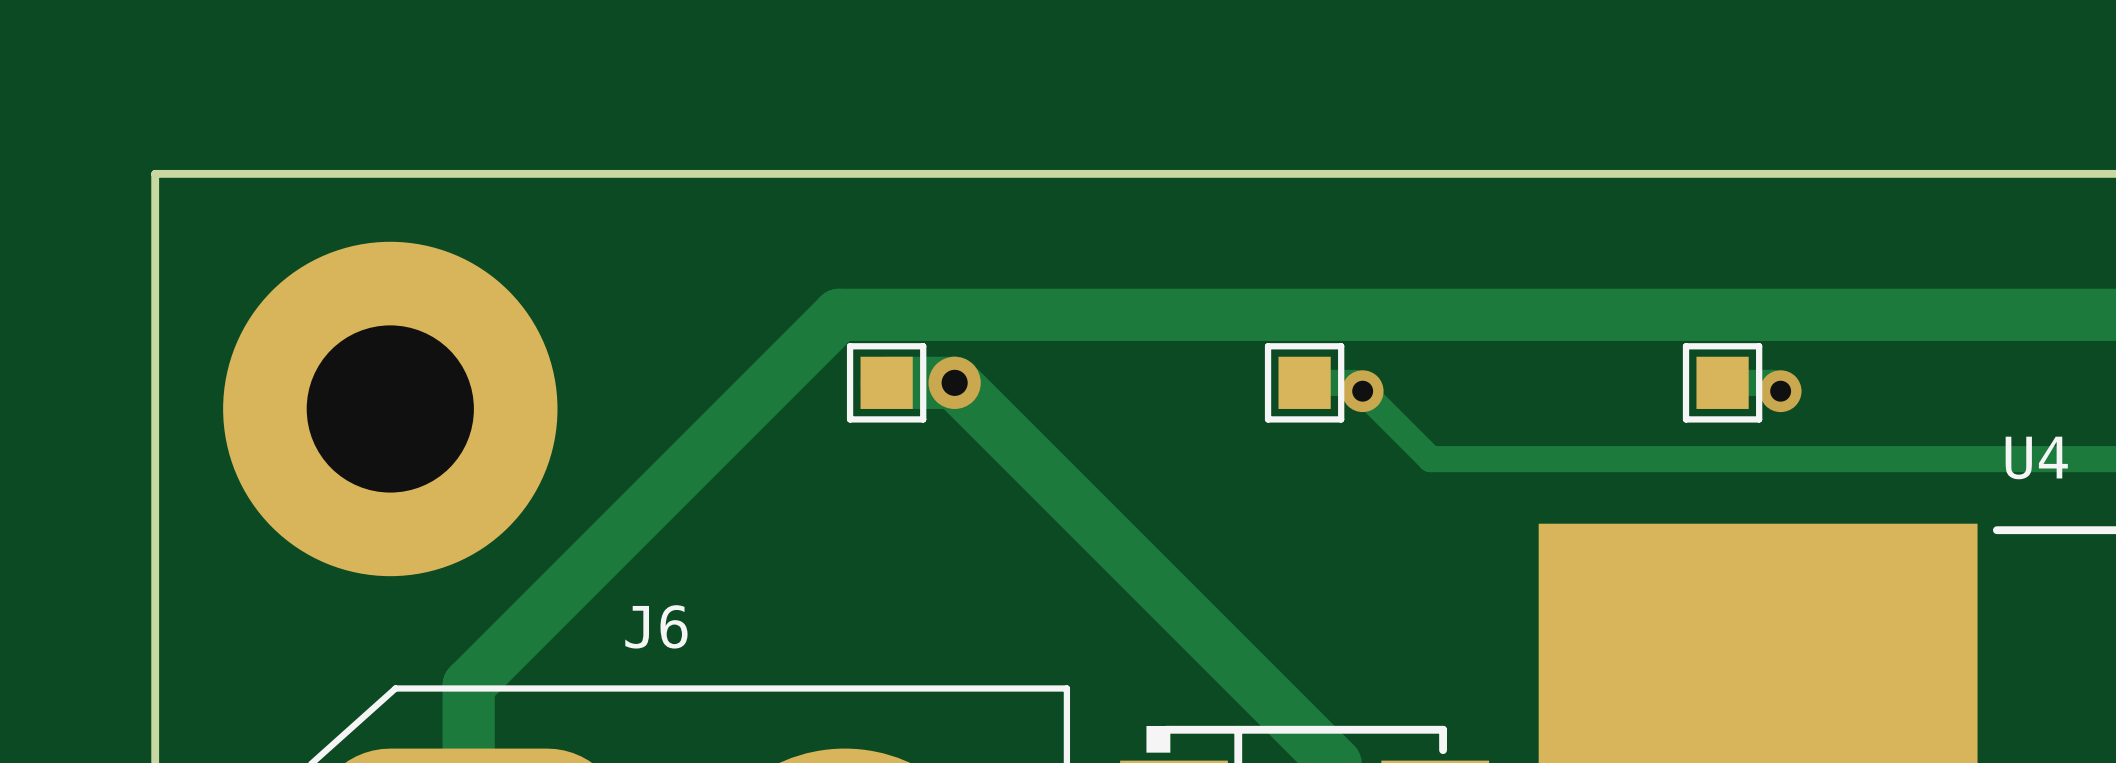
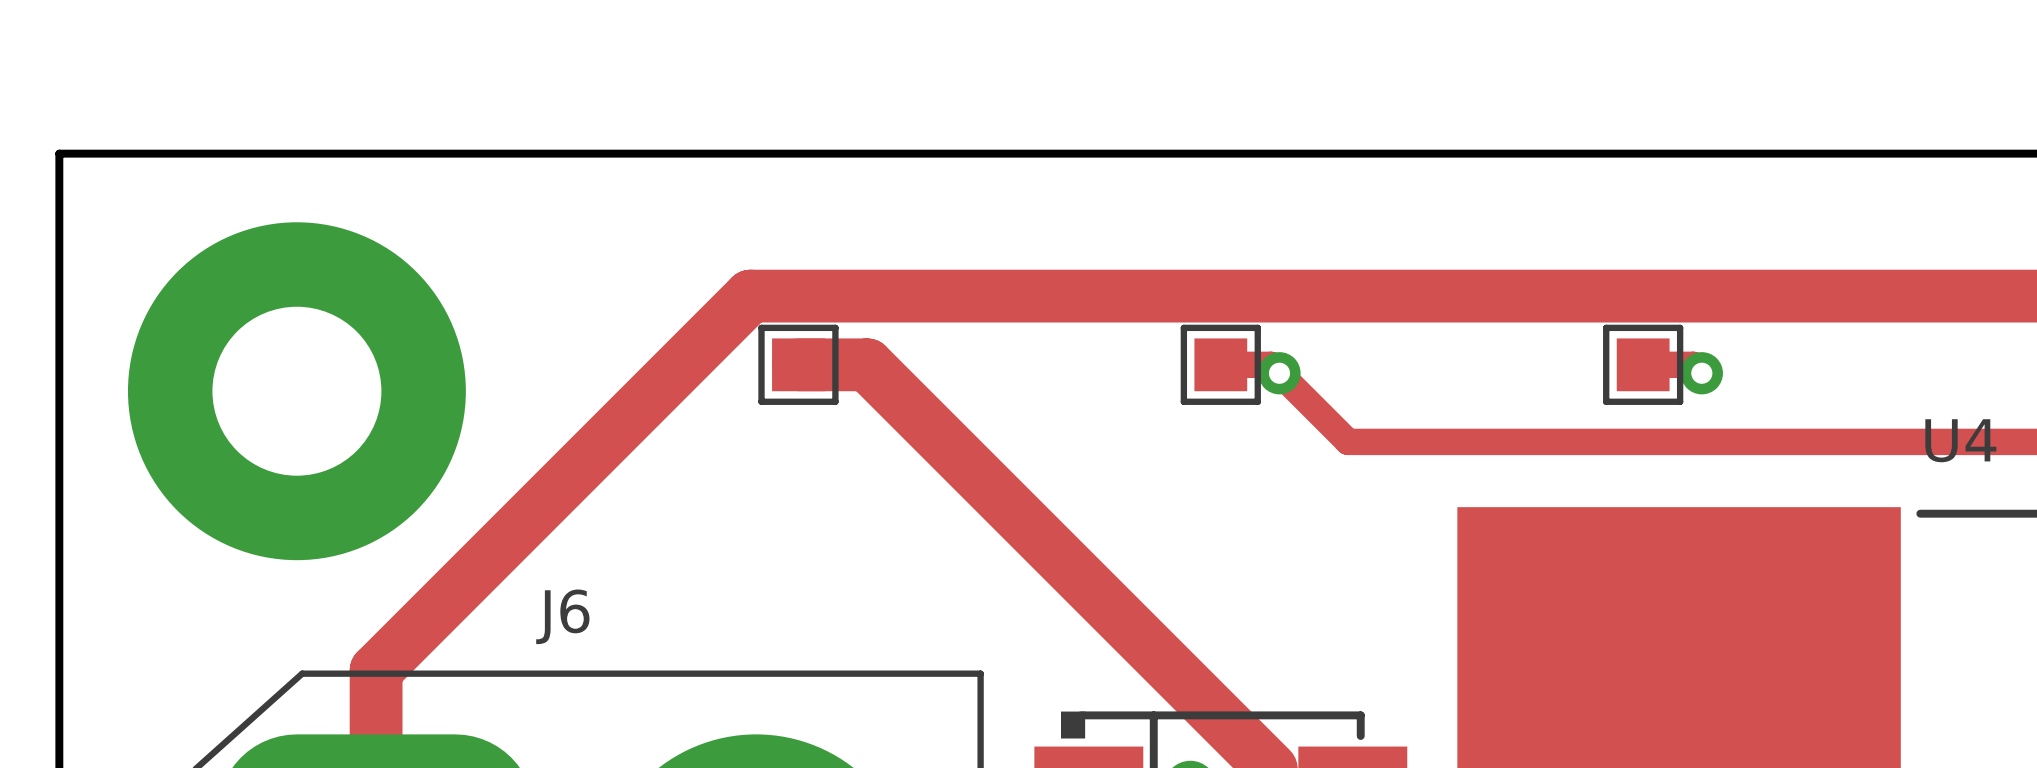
via: (954, 382) -> none

